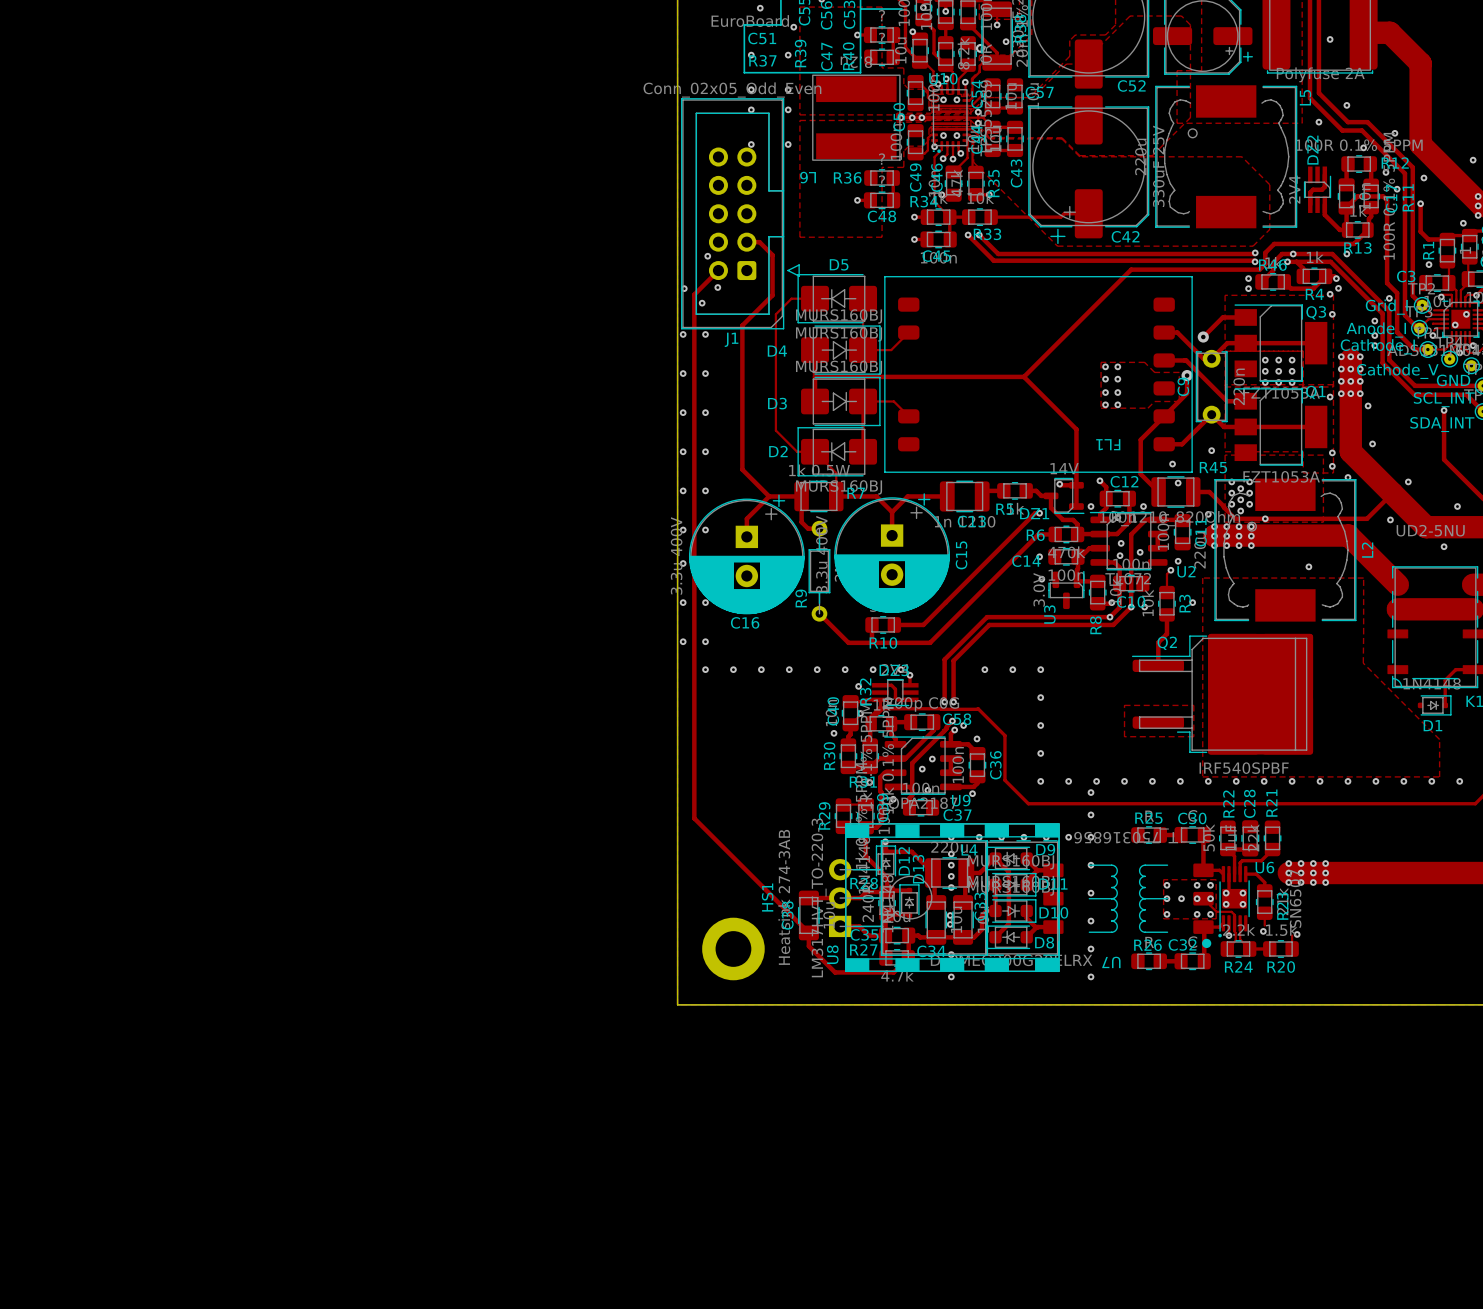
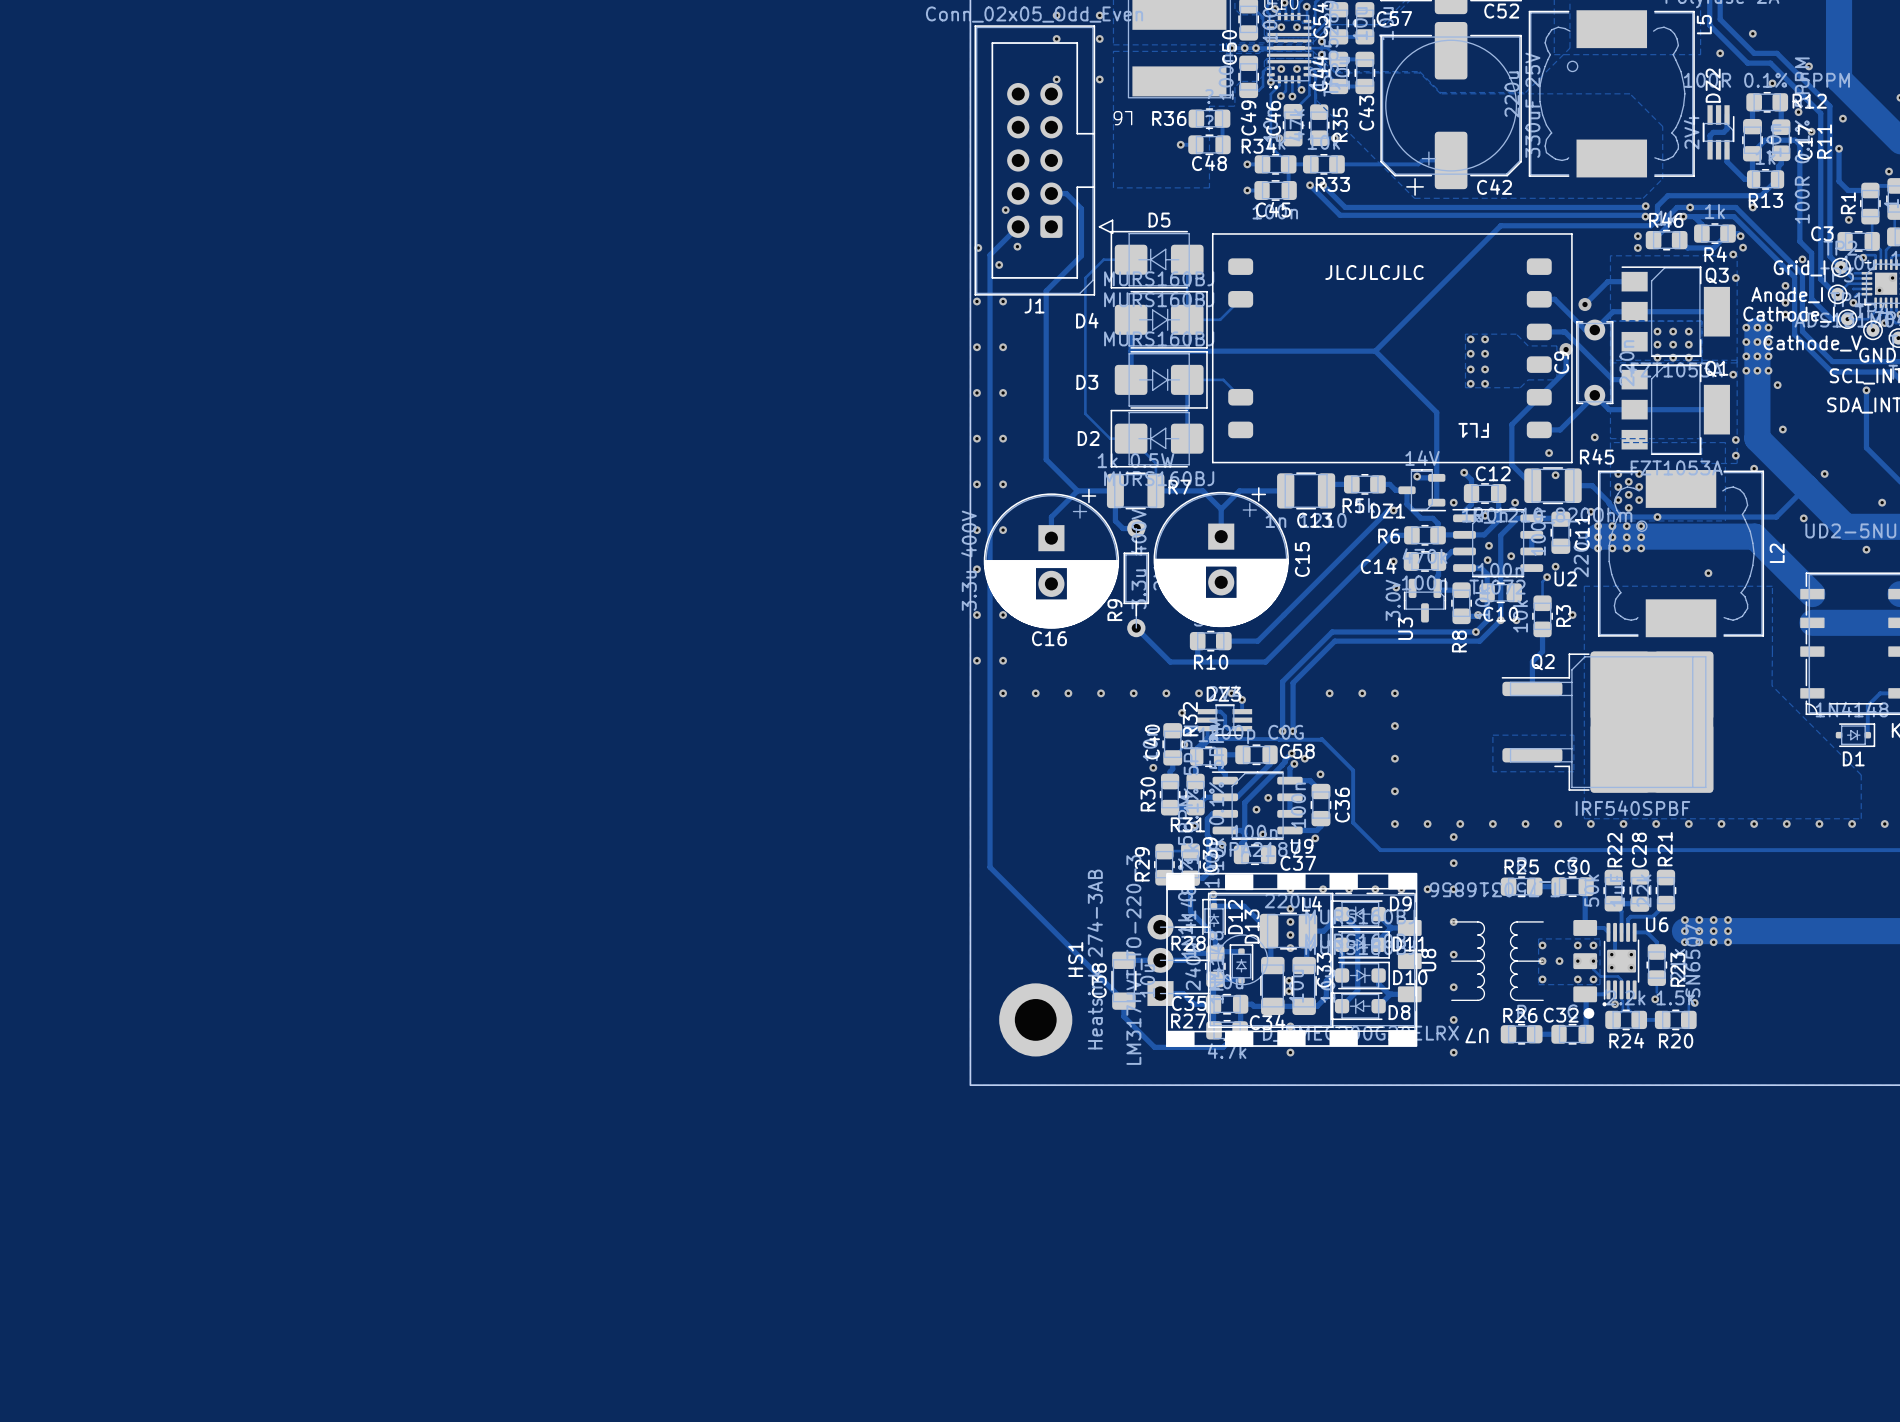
text: none -> JLCJLCJLC (1374, 272)
U8 name position: U8 (832, 954) -> U8 (1428, 960)

